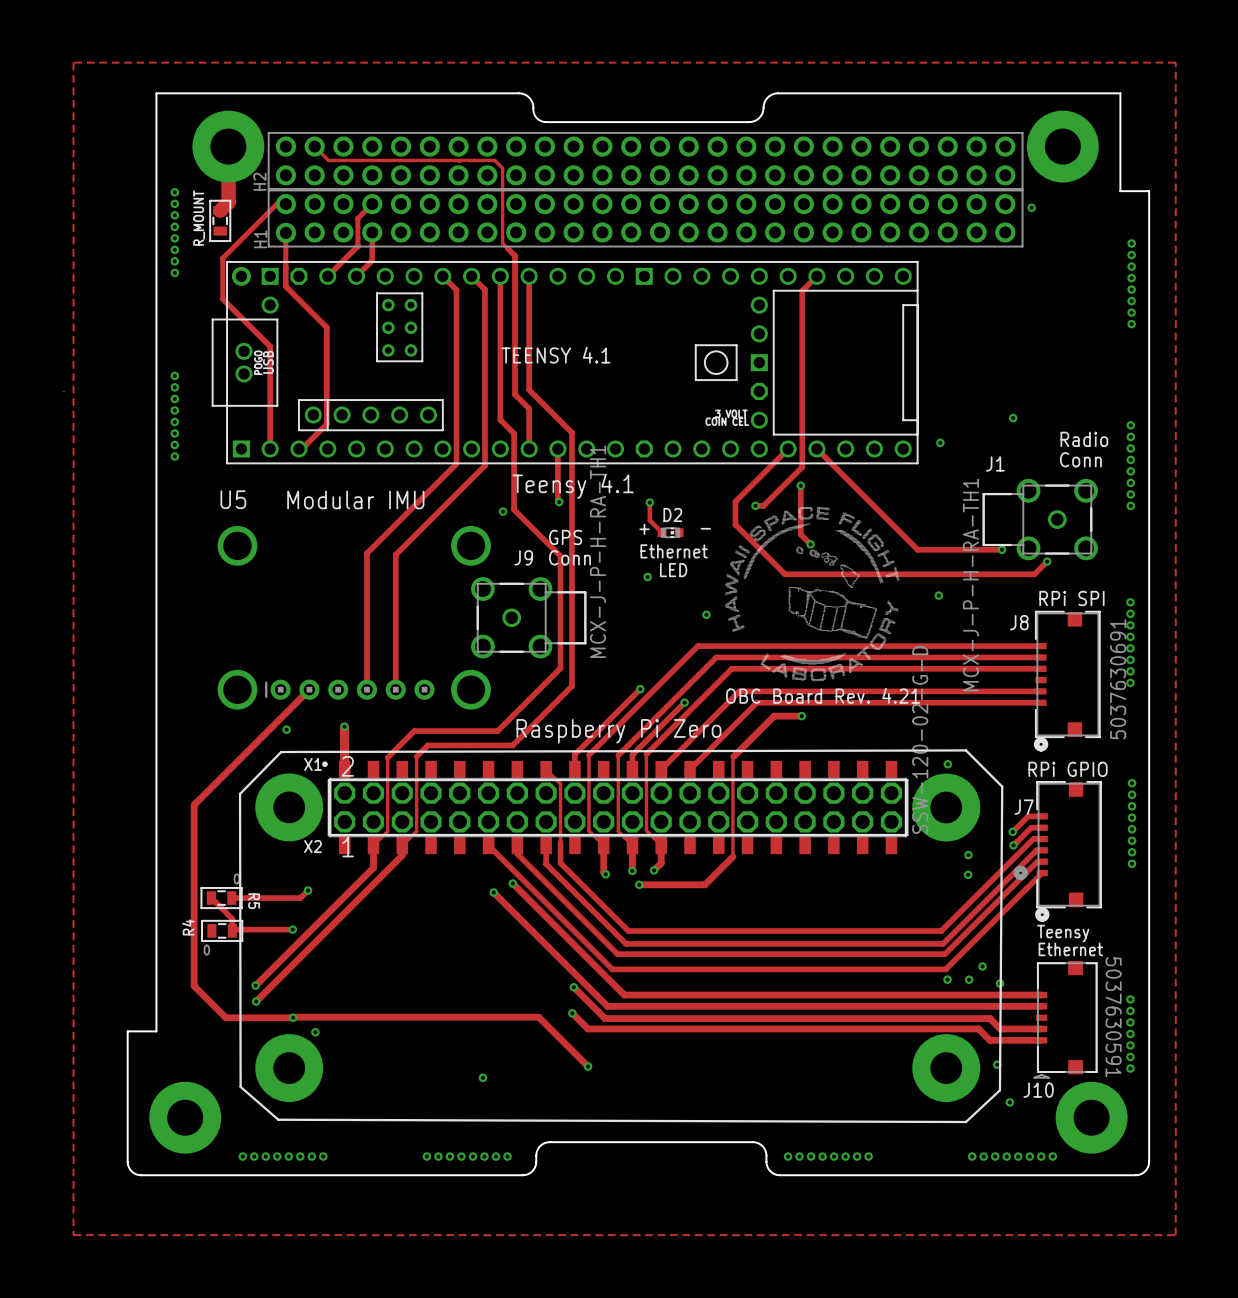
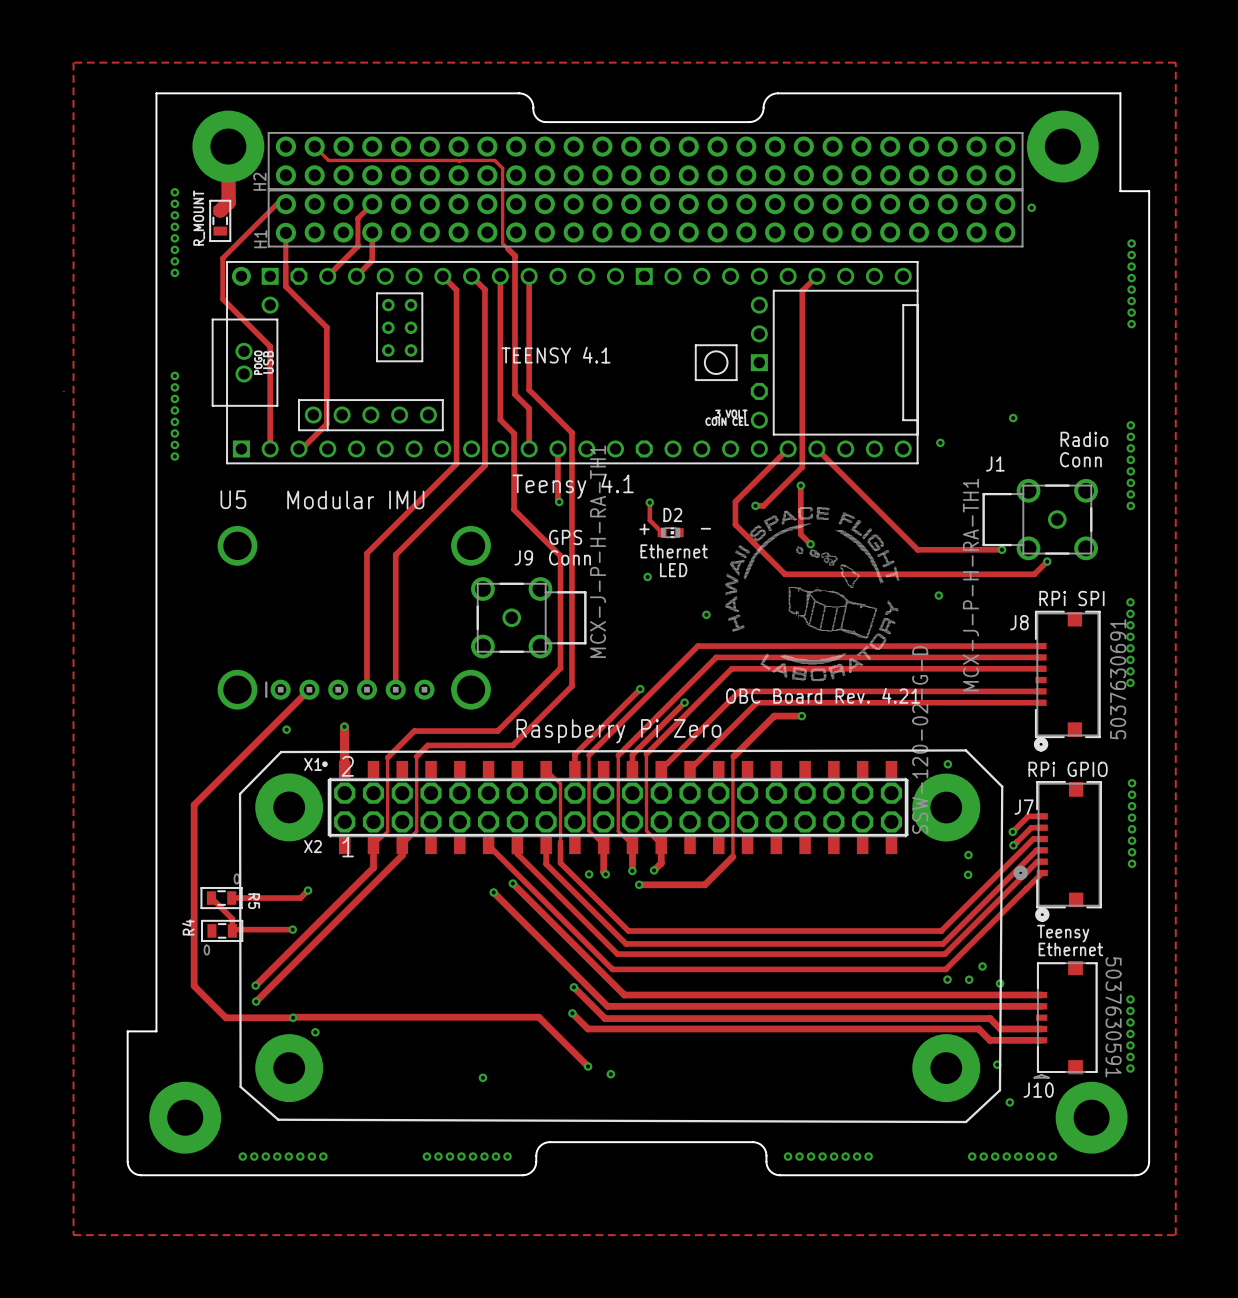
via: (503, 511) -> none
via: none -> (589, 874)
via: none -> (610, 1074)

